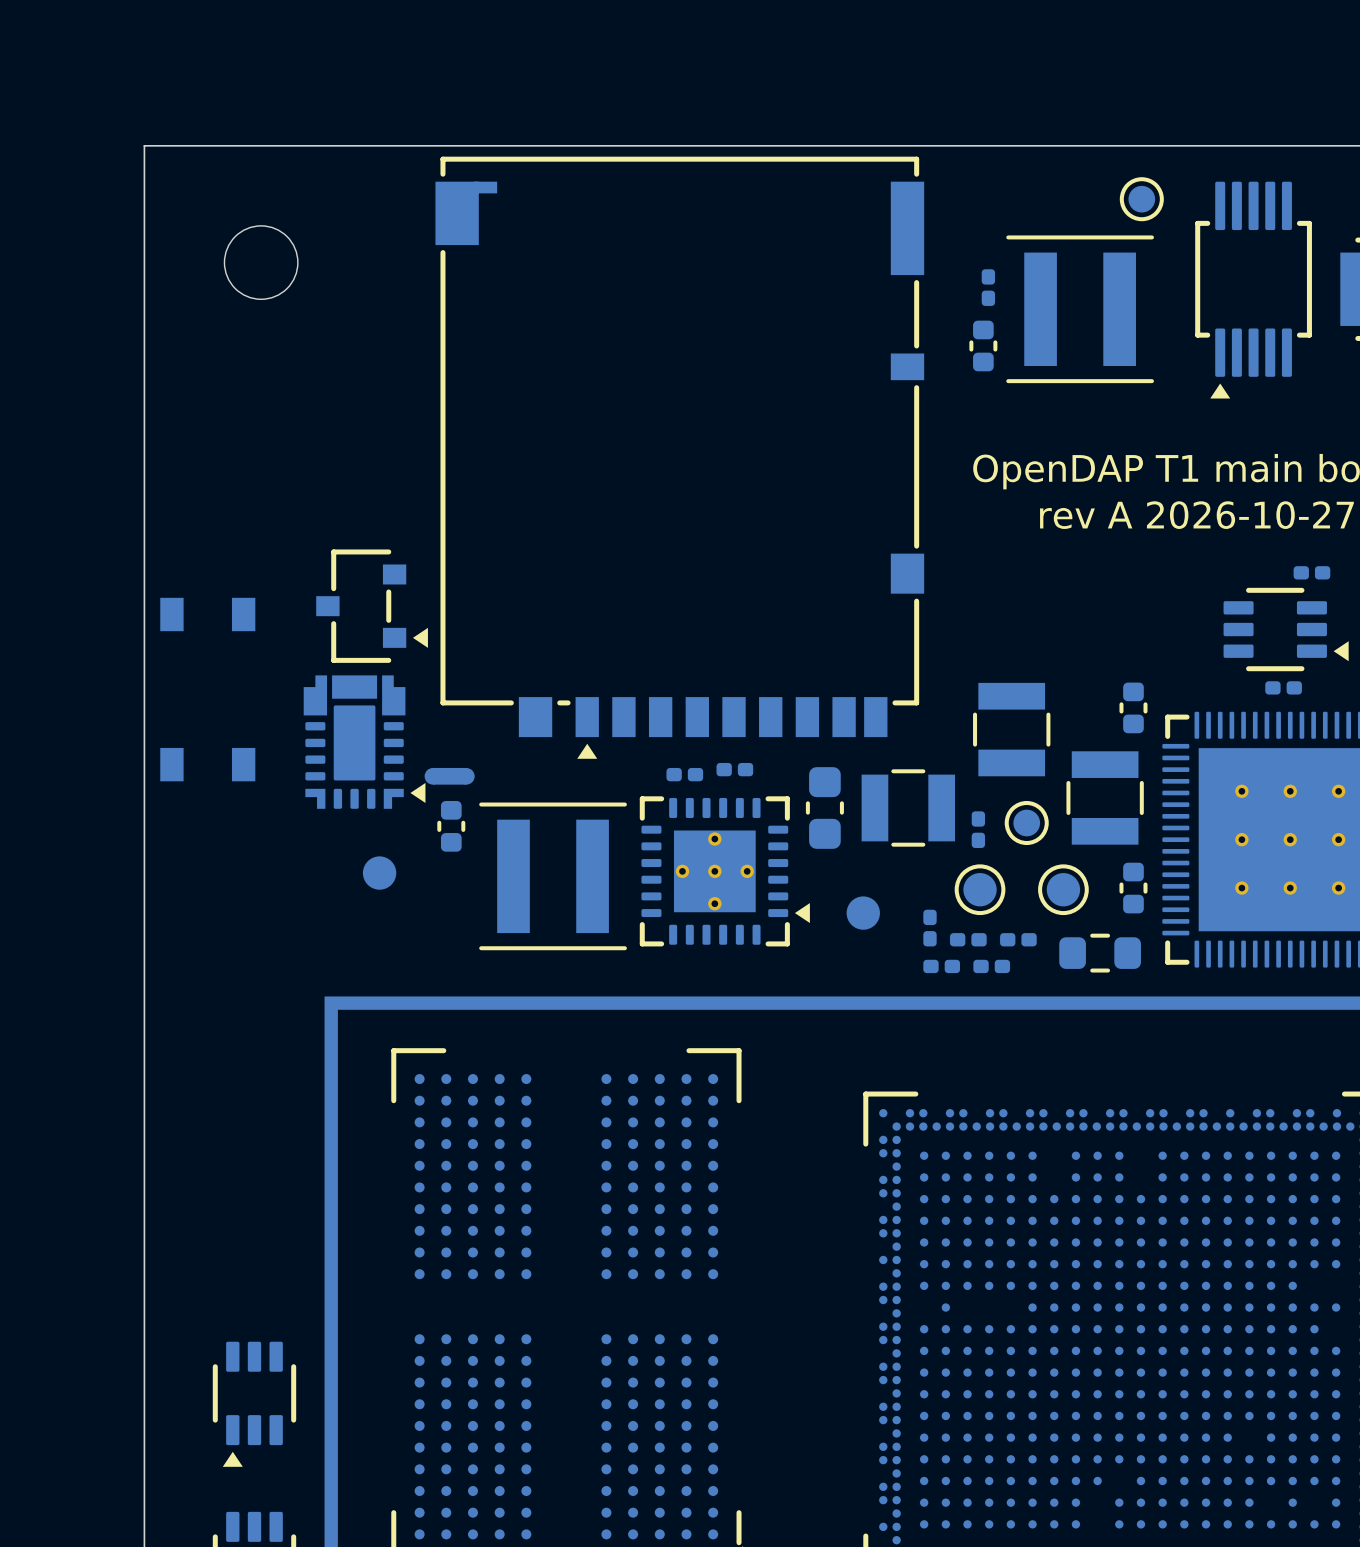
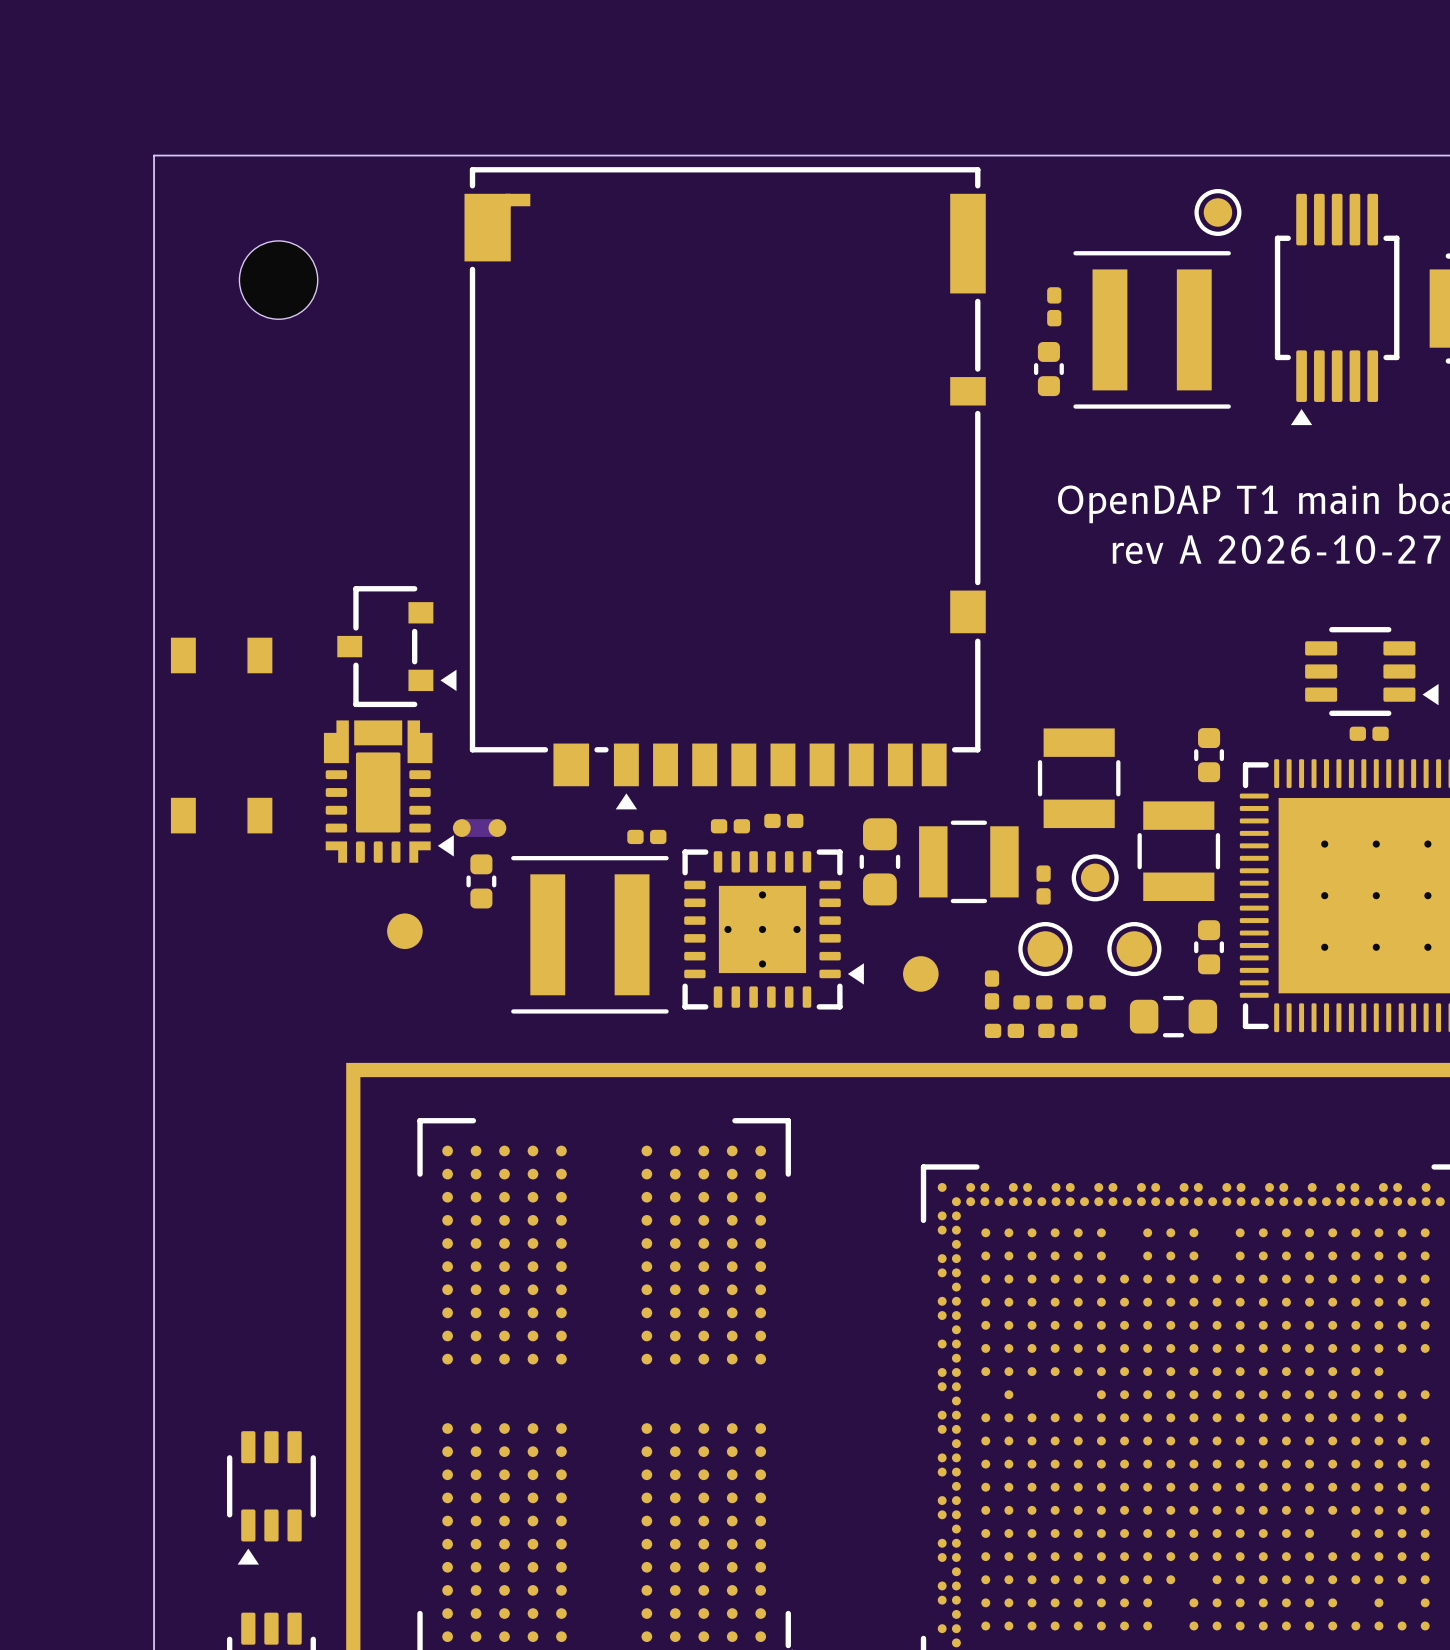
part position: (1311, 572) -> (646, 836)

